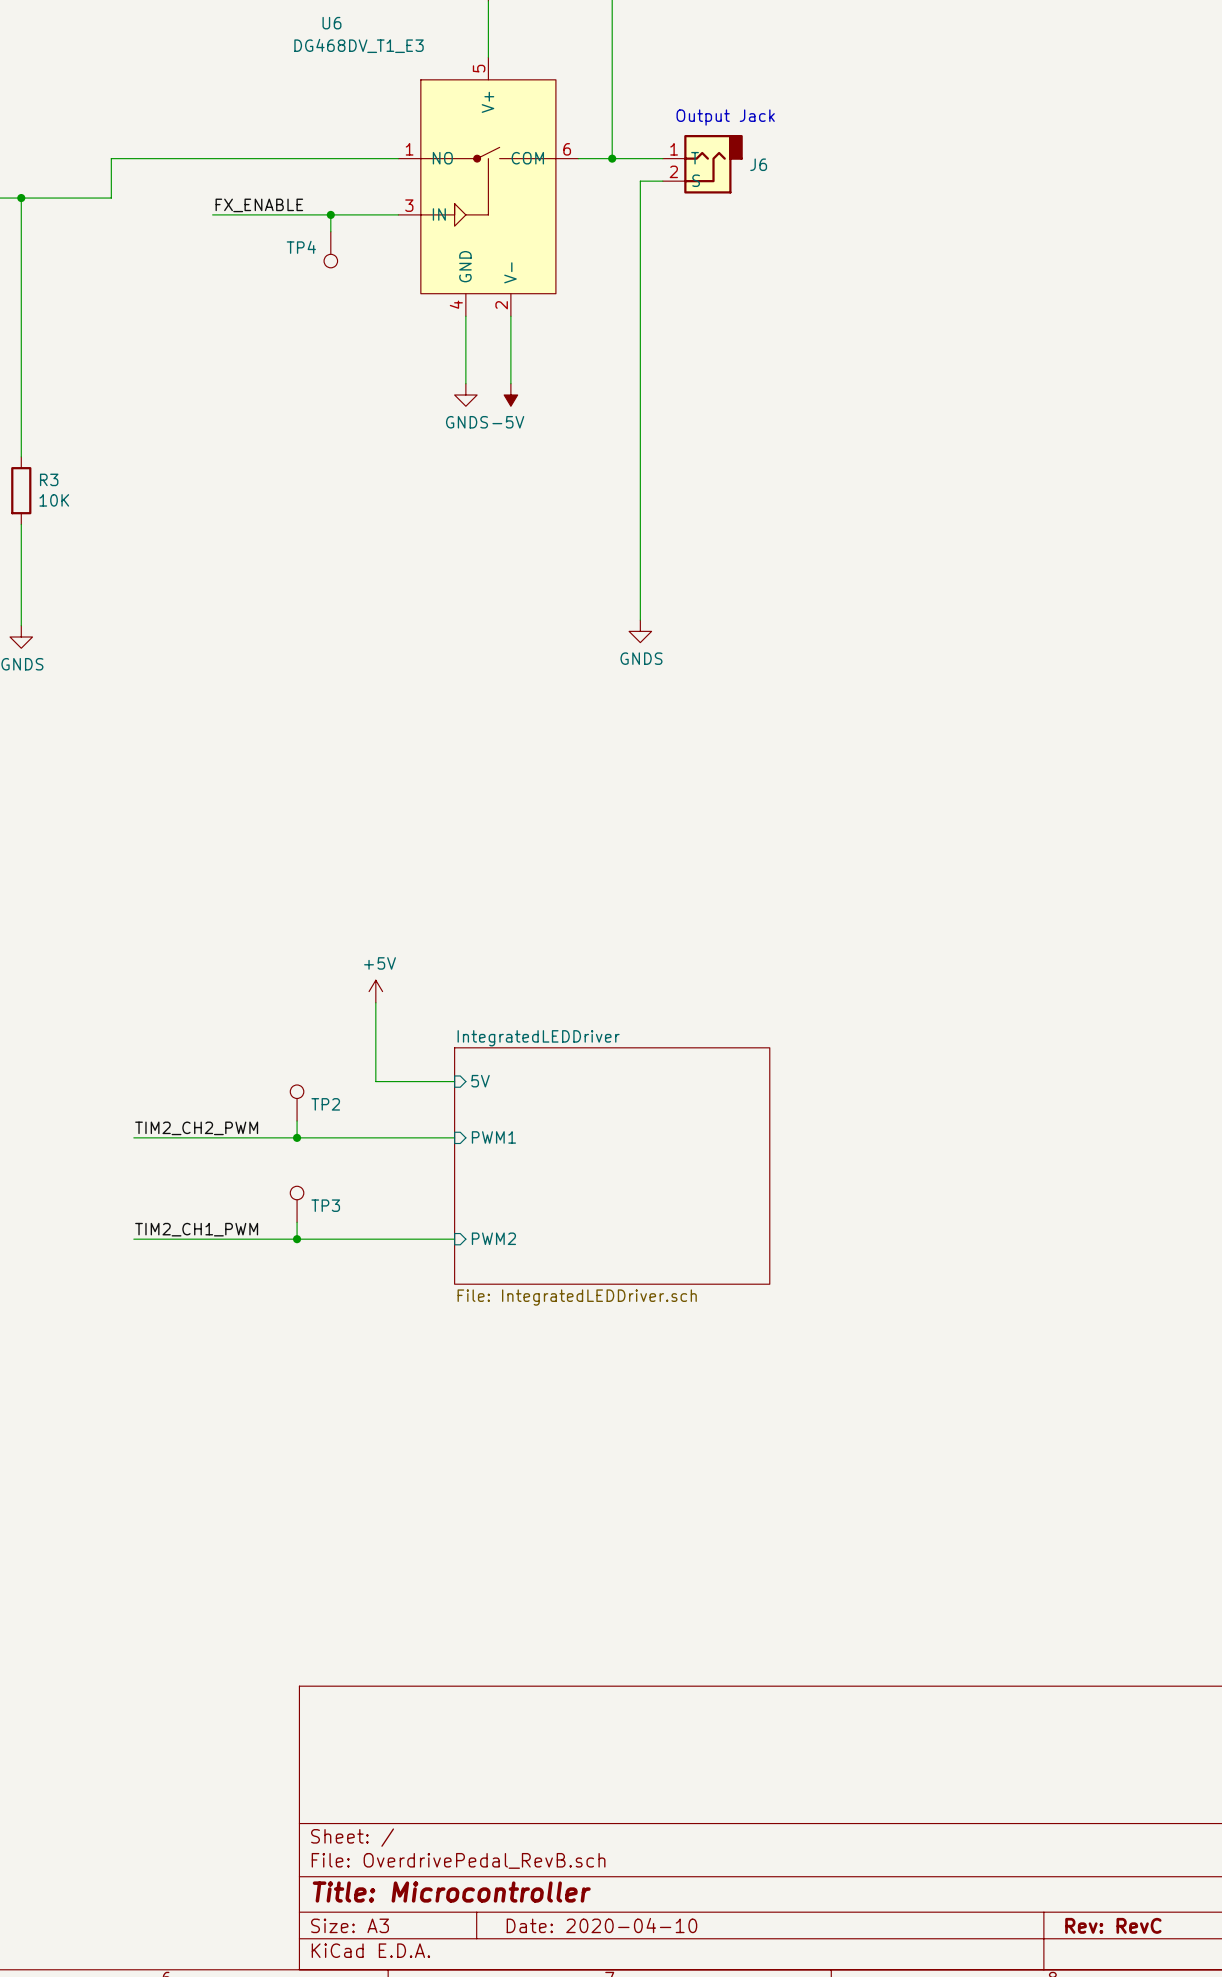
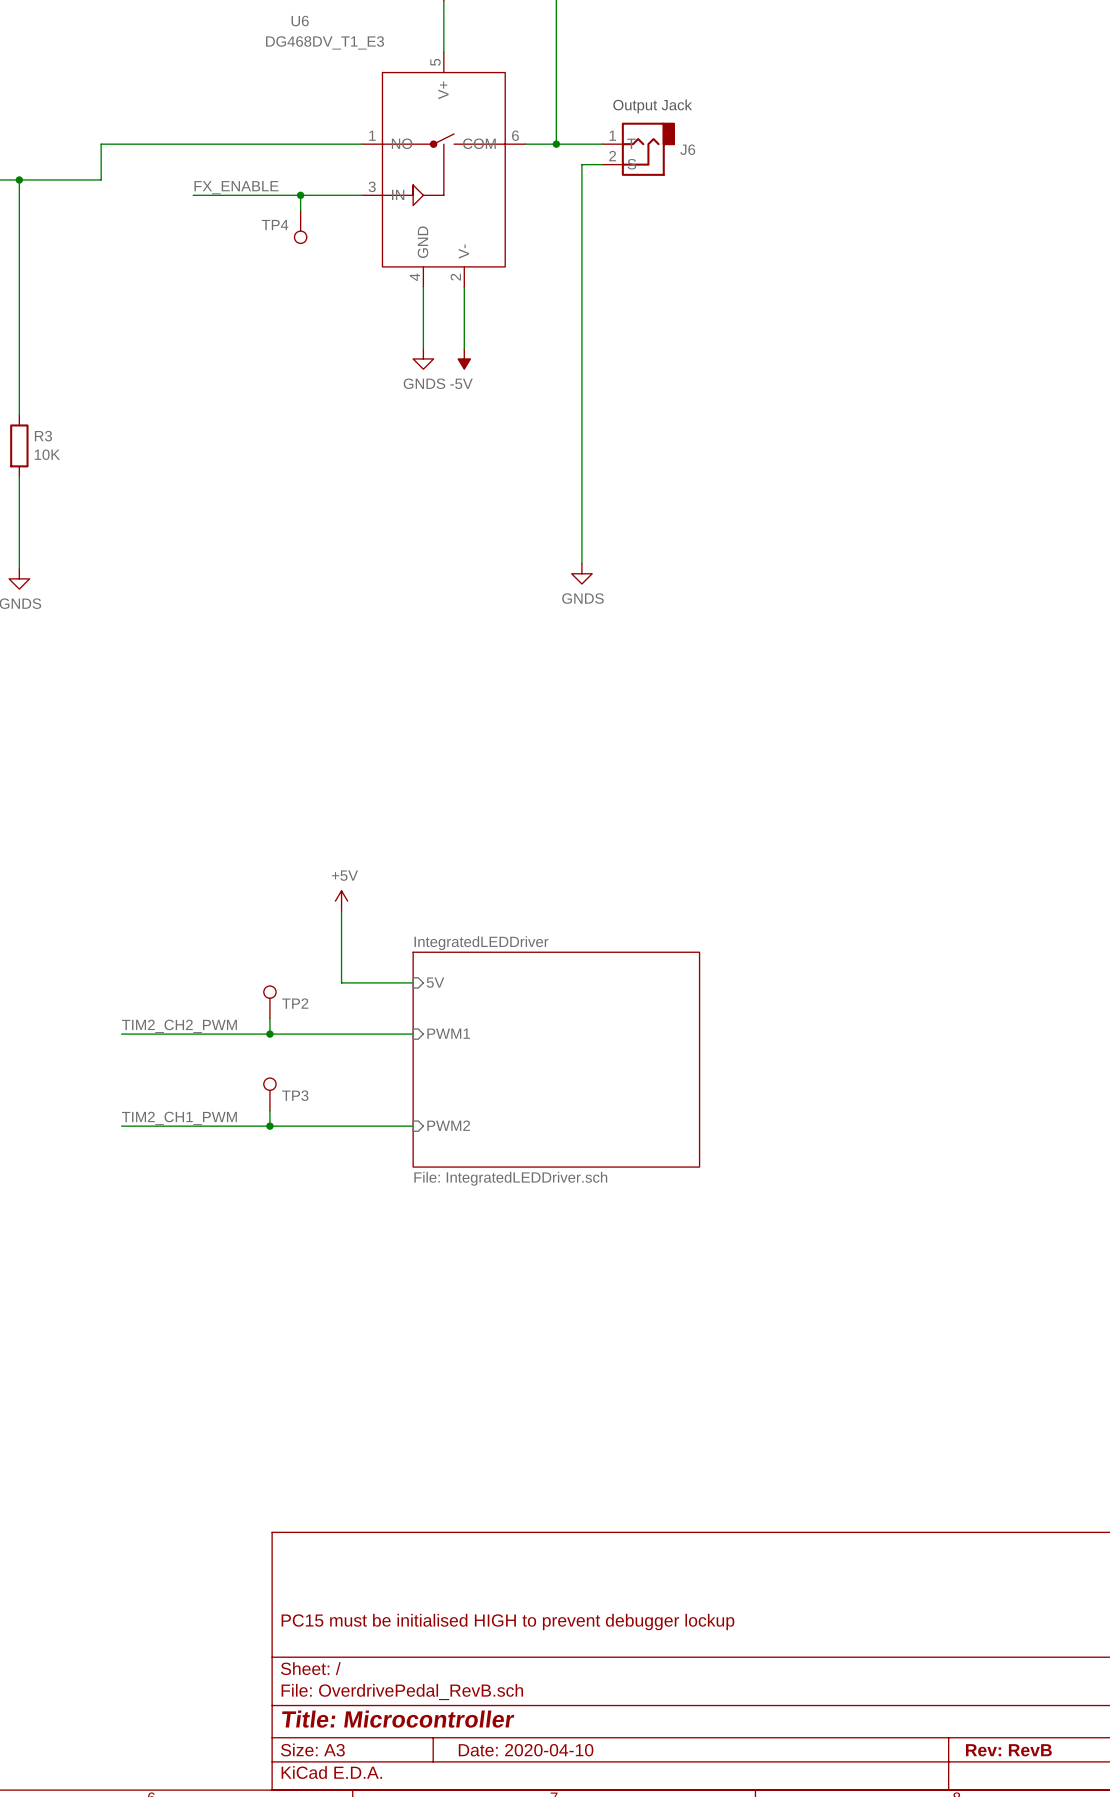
title block: none -> PC15 must be initialised HIGH to prevent debugger lockup (507, 1622)
title block: Rev: RevC (1113, 1925) -> Rev: RevB (1008, 1750)

